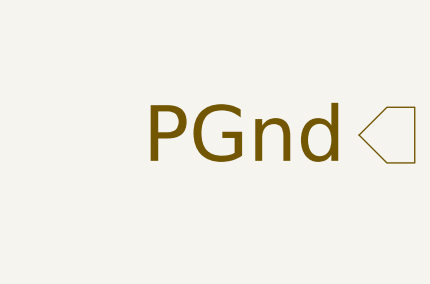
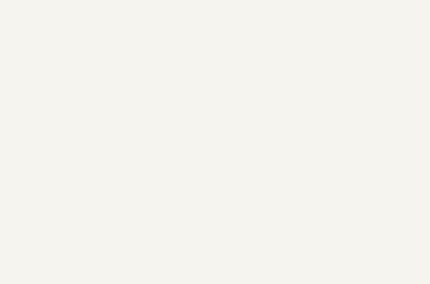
hierarchical label: PGnd (244, 132) -> none

